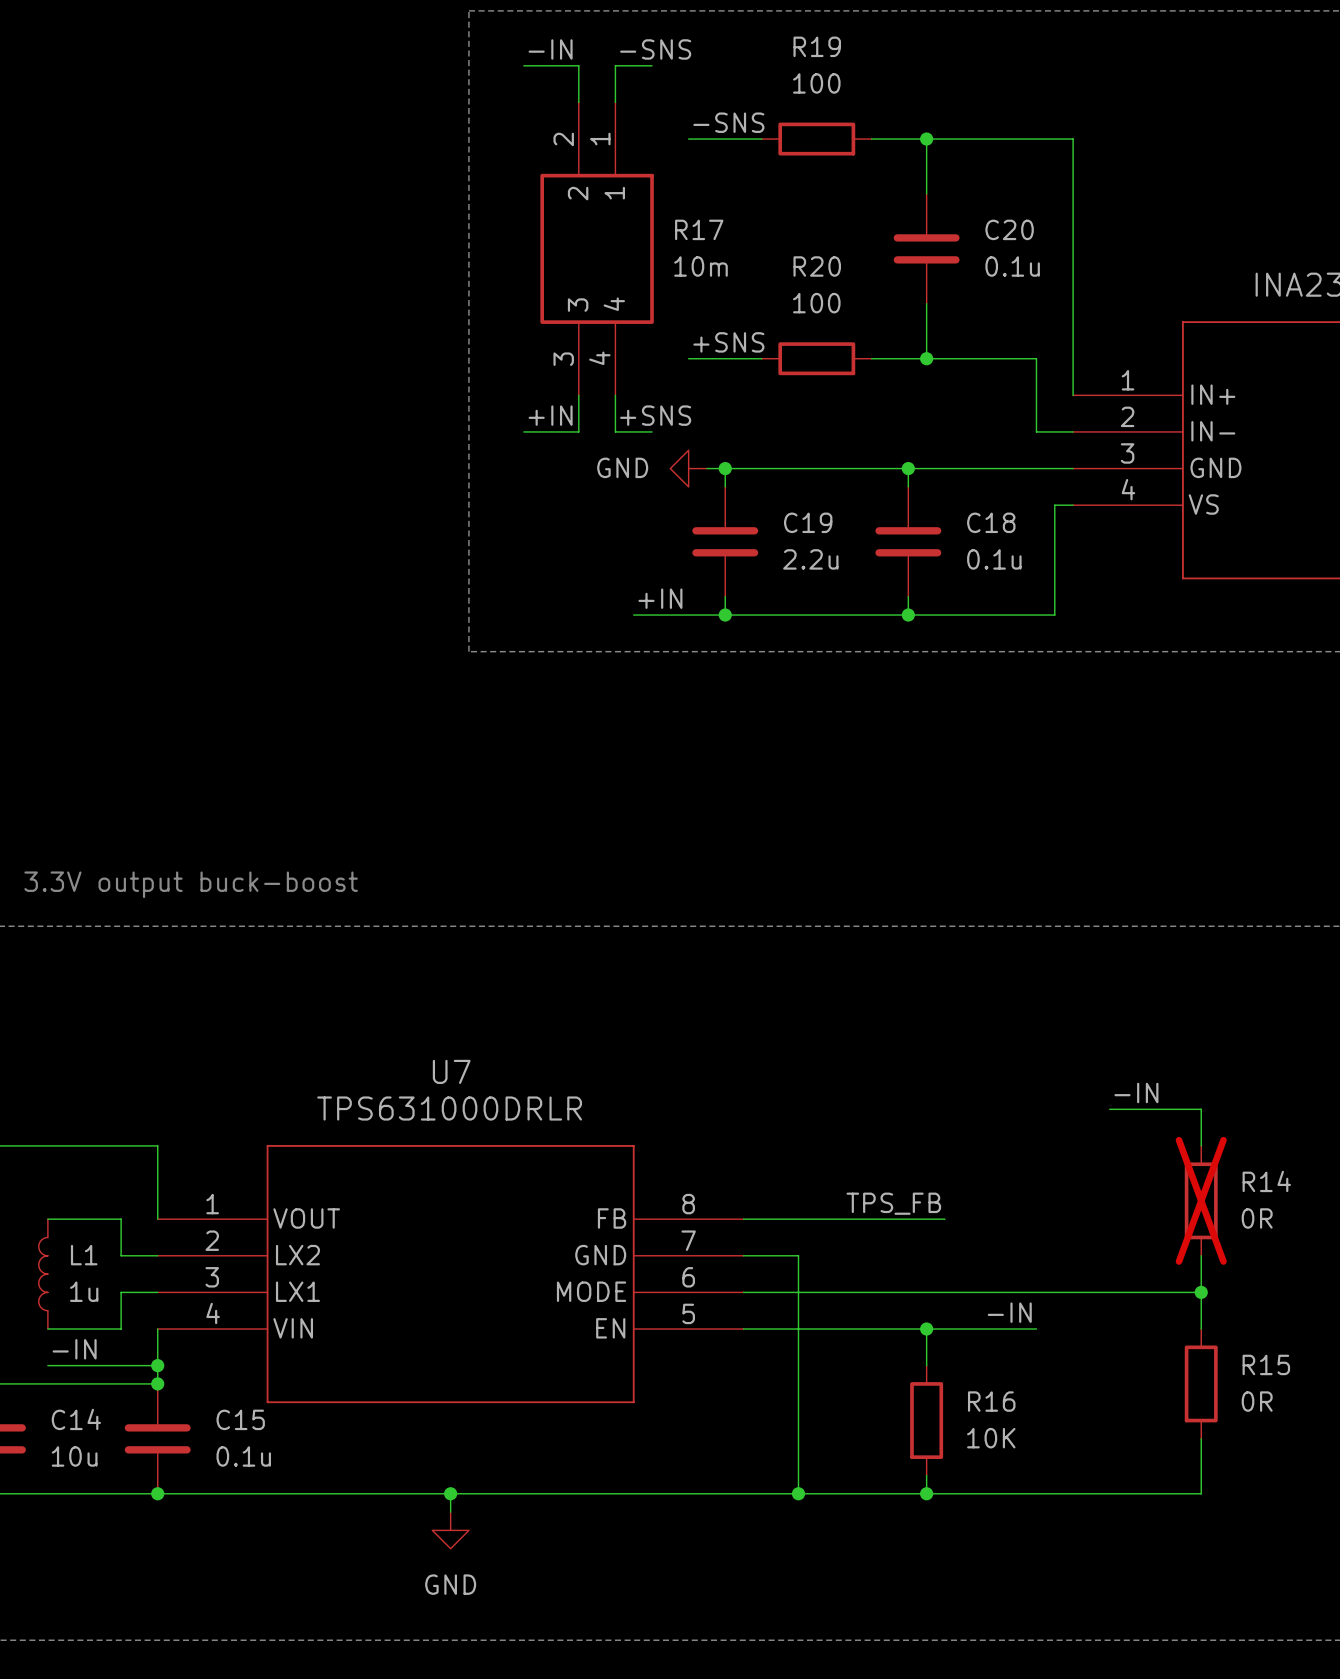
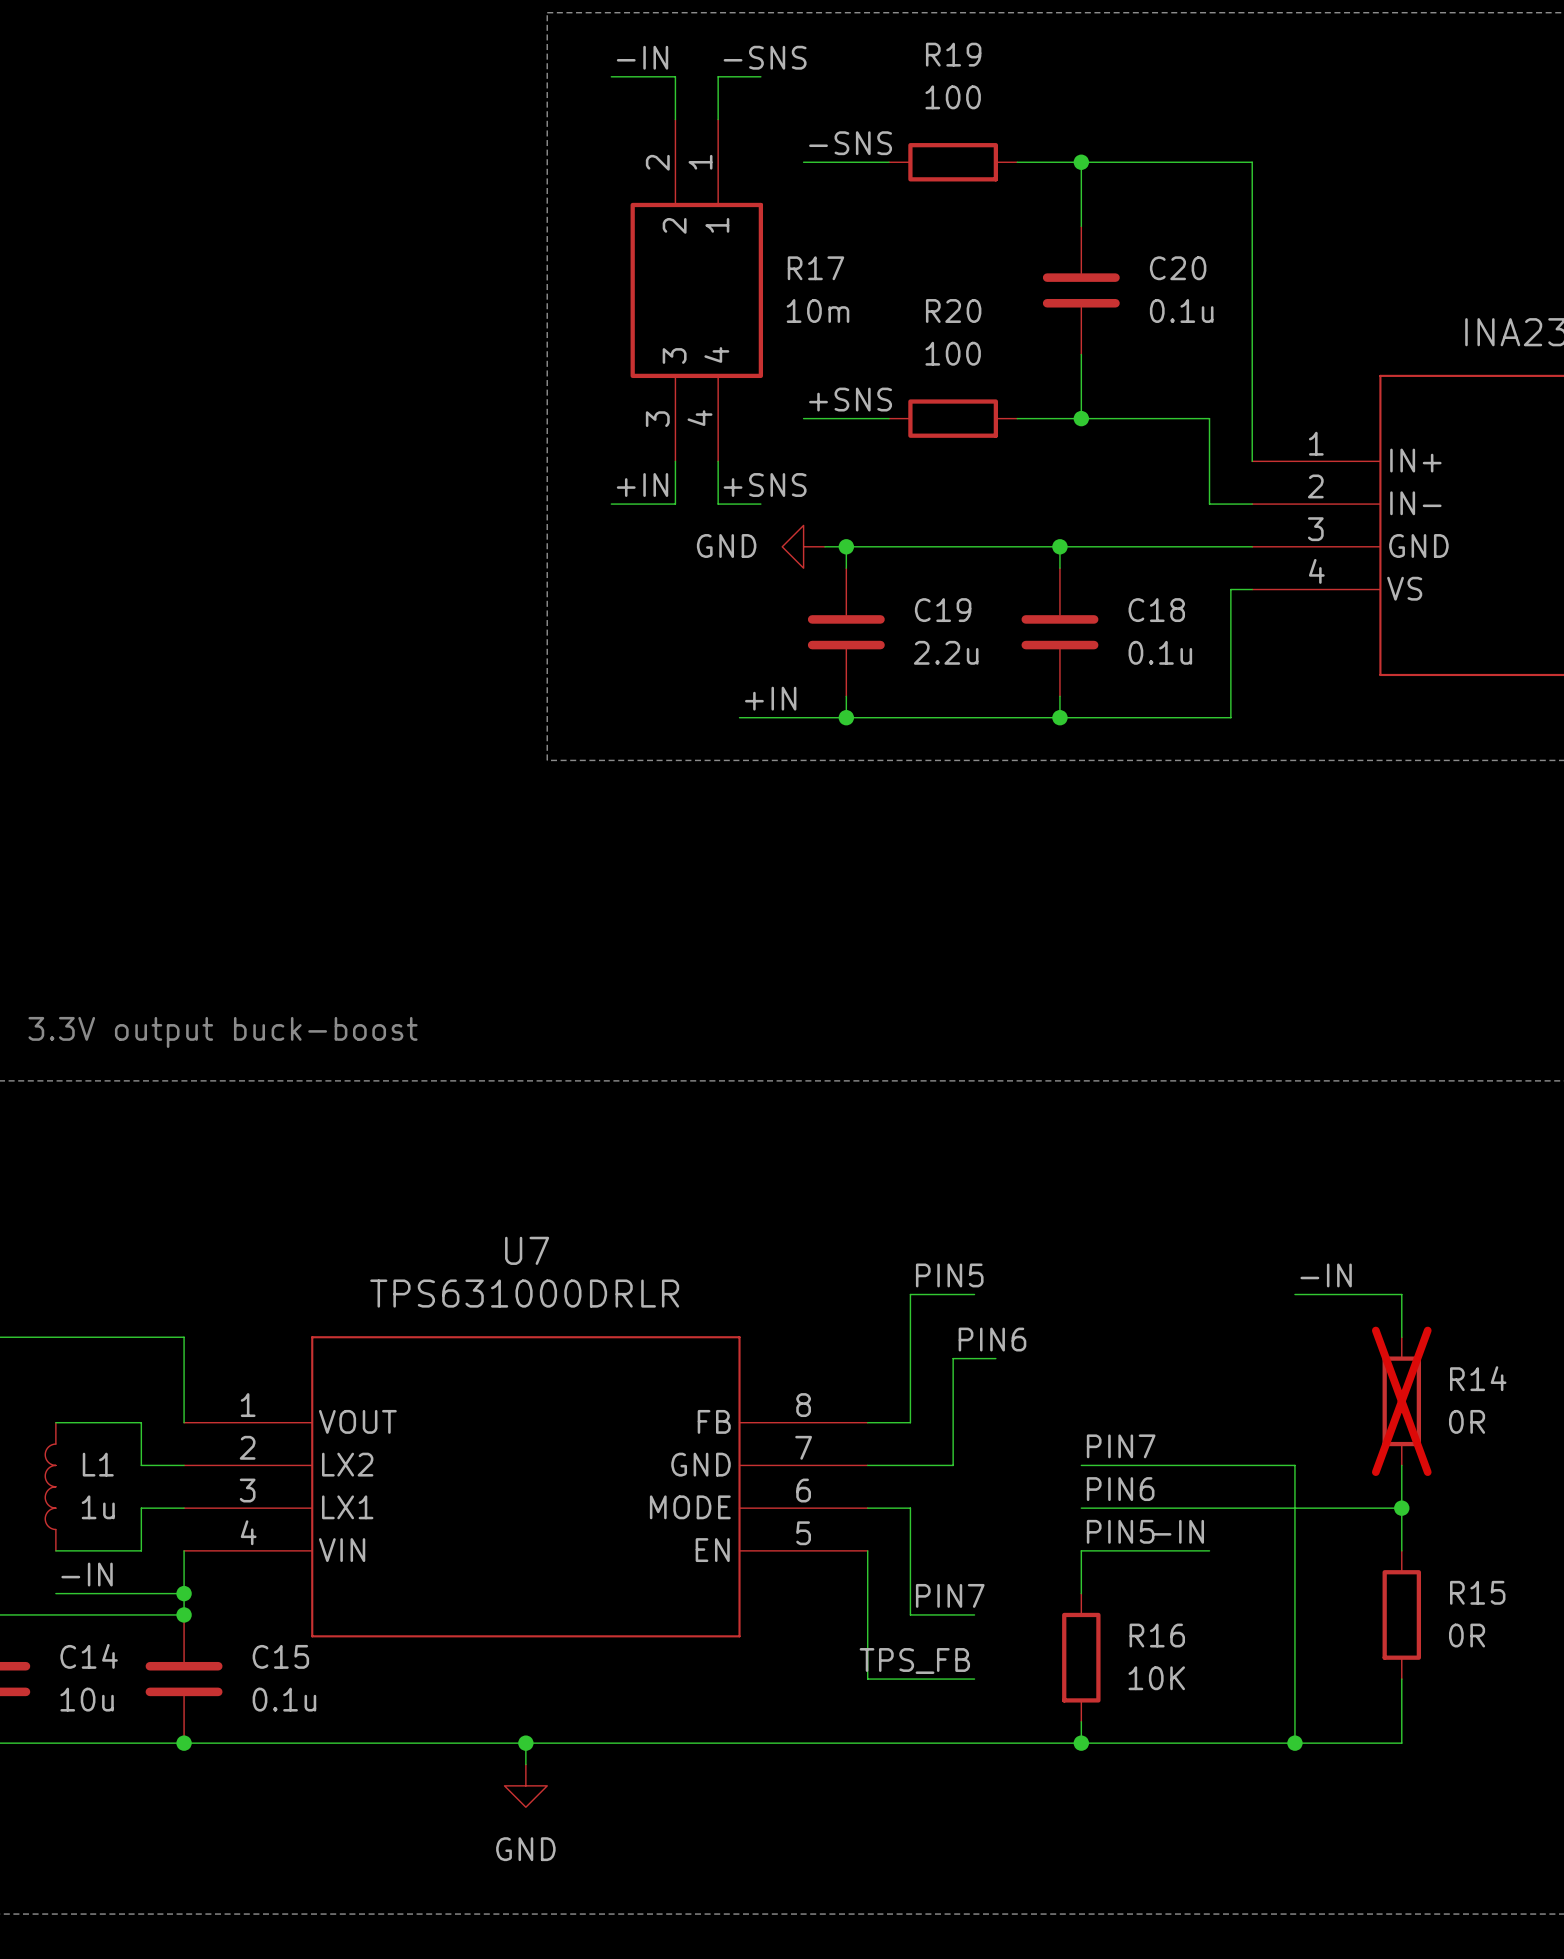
label: none -> PIN5 (949, 1275)
label: none -> PIN6 (992, 1339)
label position: TPS_FB (893, 1203) -> TPS_FB (914, 1661)
wire: (780, 1219) (944, 1219) -> (910, 1422) (910, 1294) (974, 1294)
label: none -> PIN7 (1121, 1446)
wire: (798, 1255) (798, 1493) -> (931, 1465) (953, 1465) (953, 1358) (995, 1358)
wire: none -> (1081, 1465) (1294, 1465) (1294, 1743)
label: none -> PIN6 (1120, 1489)
wire: (780, 1292) (926, 1292) -> (910, 1508) (910, 1614) (974, 1614)
label: none -> PIN5 (1120, 1531)
wire: (743, 1329) (926, 1329) -> (867, 1550) (867, 1679) (974, 1679)
junction: (926, 1329) -> none
label: none -> PIN7 (950, 1595)
junction: (798, 1493) -> none
junction: none -> (1294, 1743)

